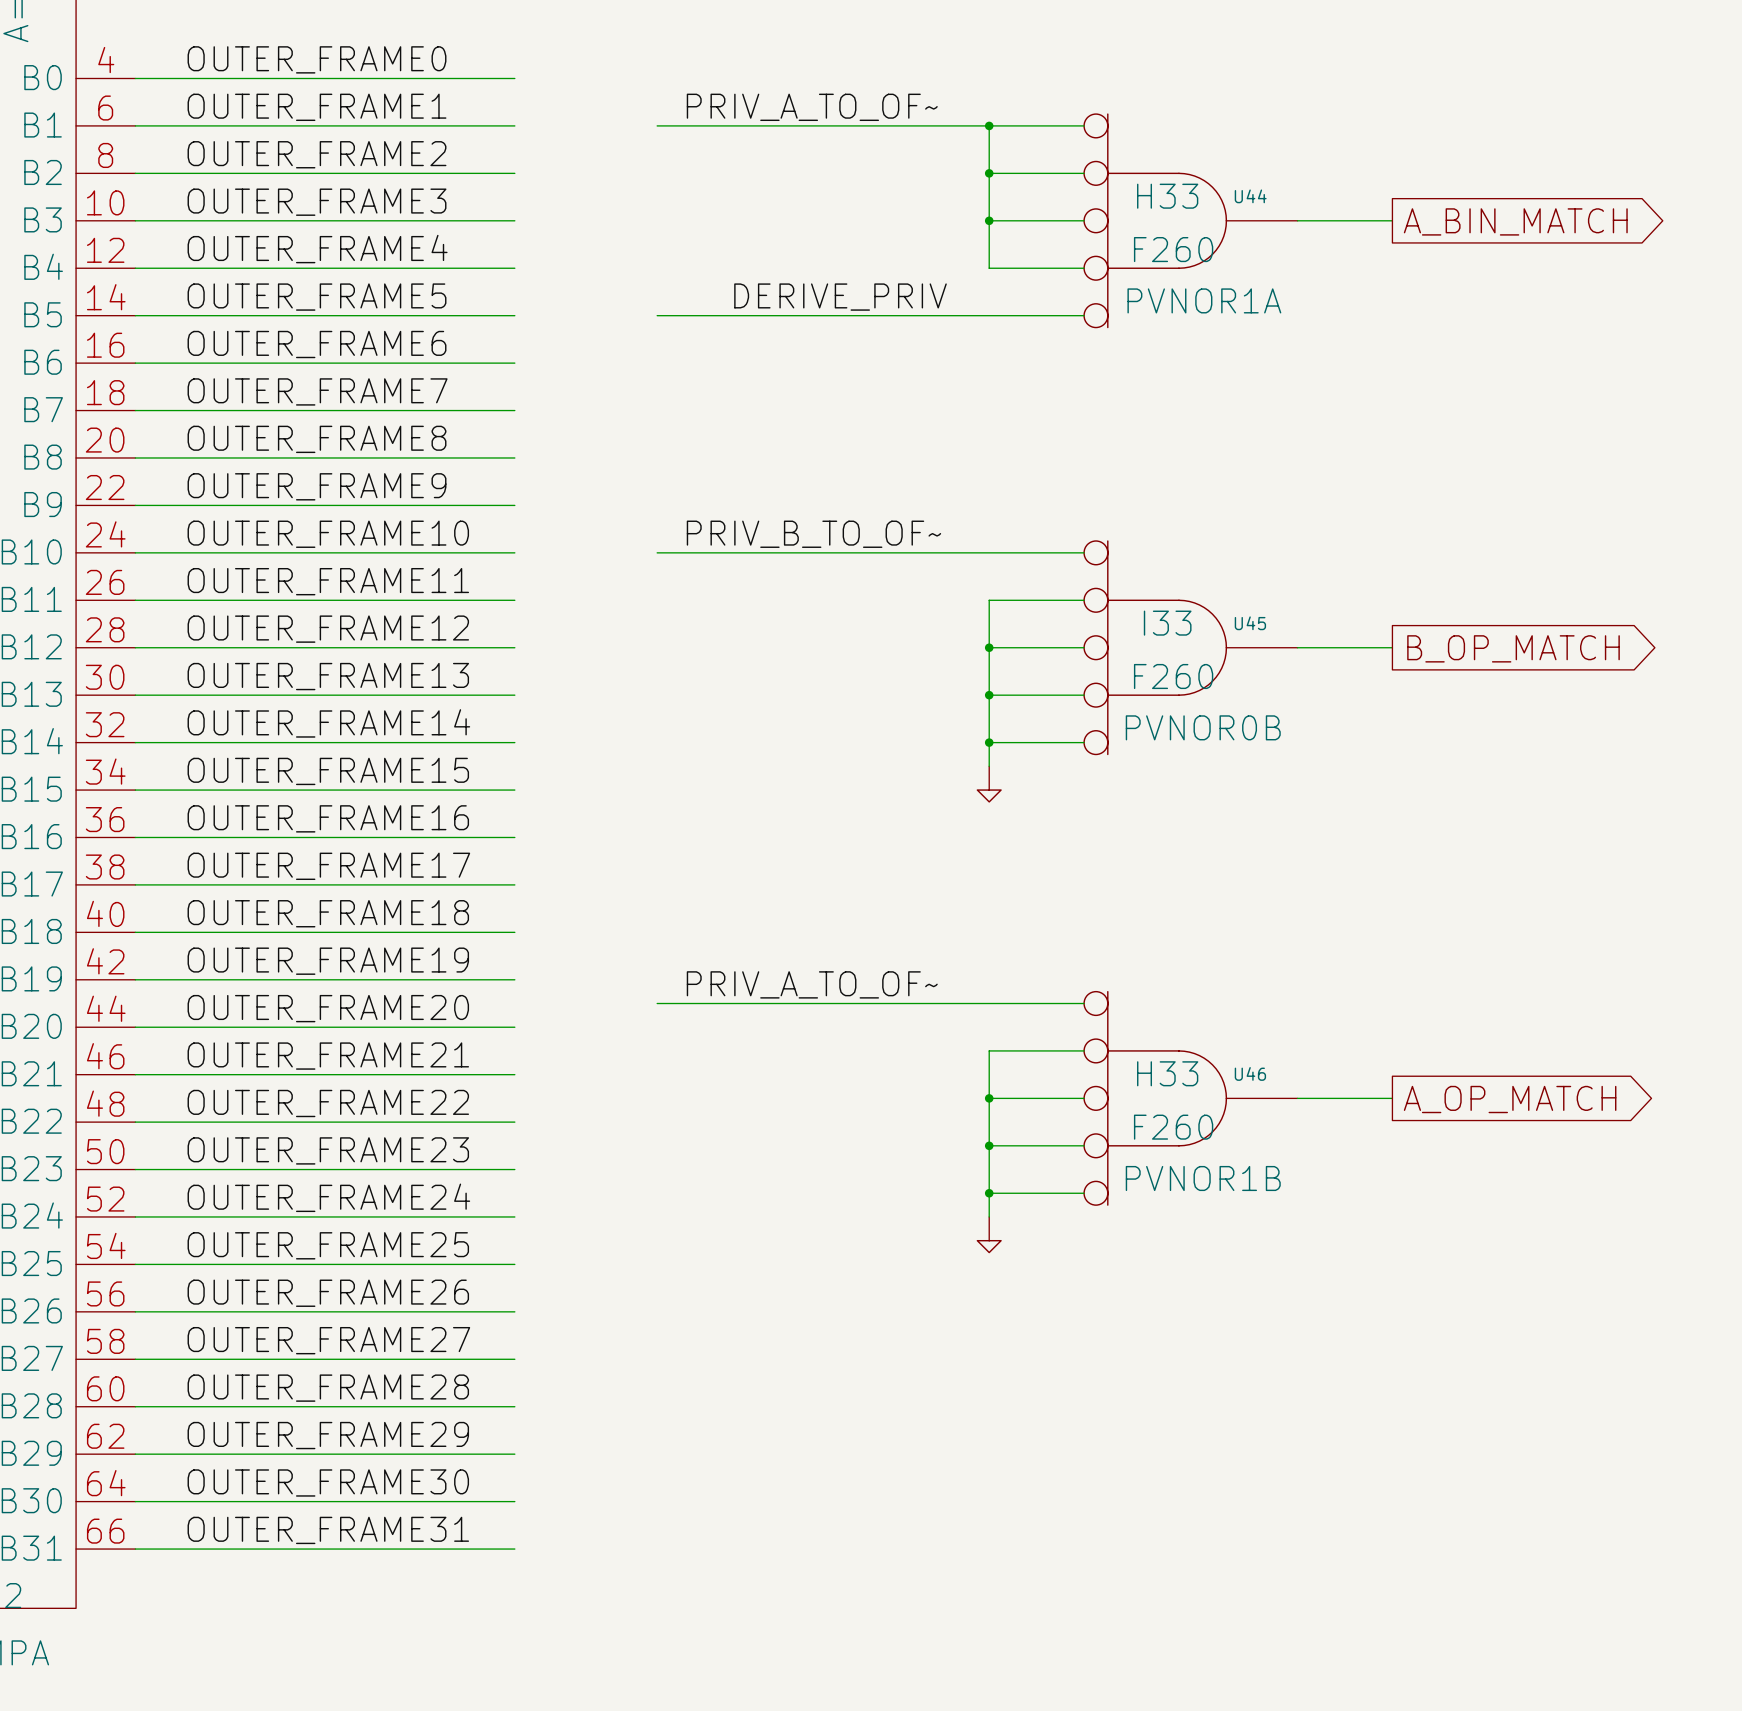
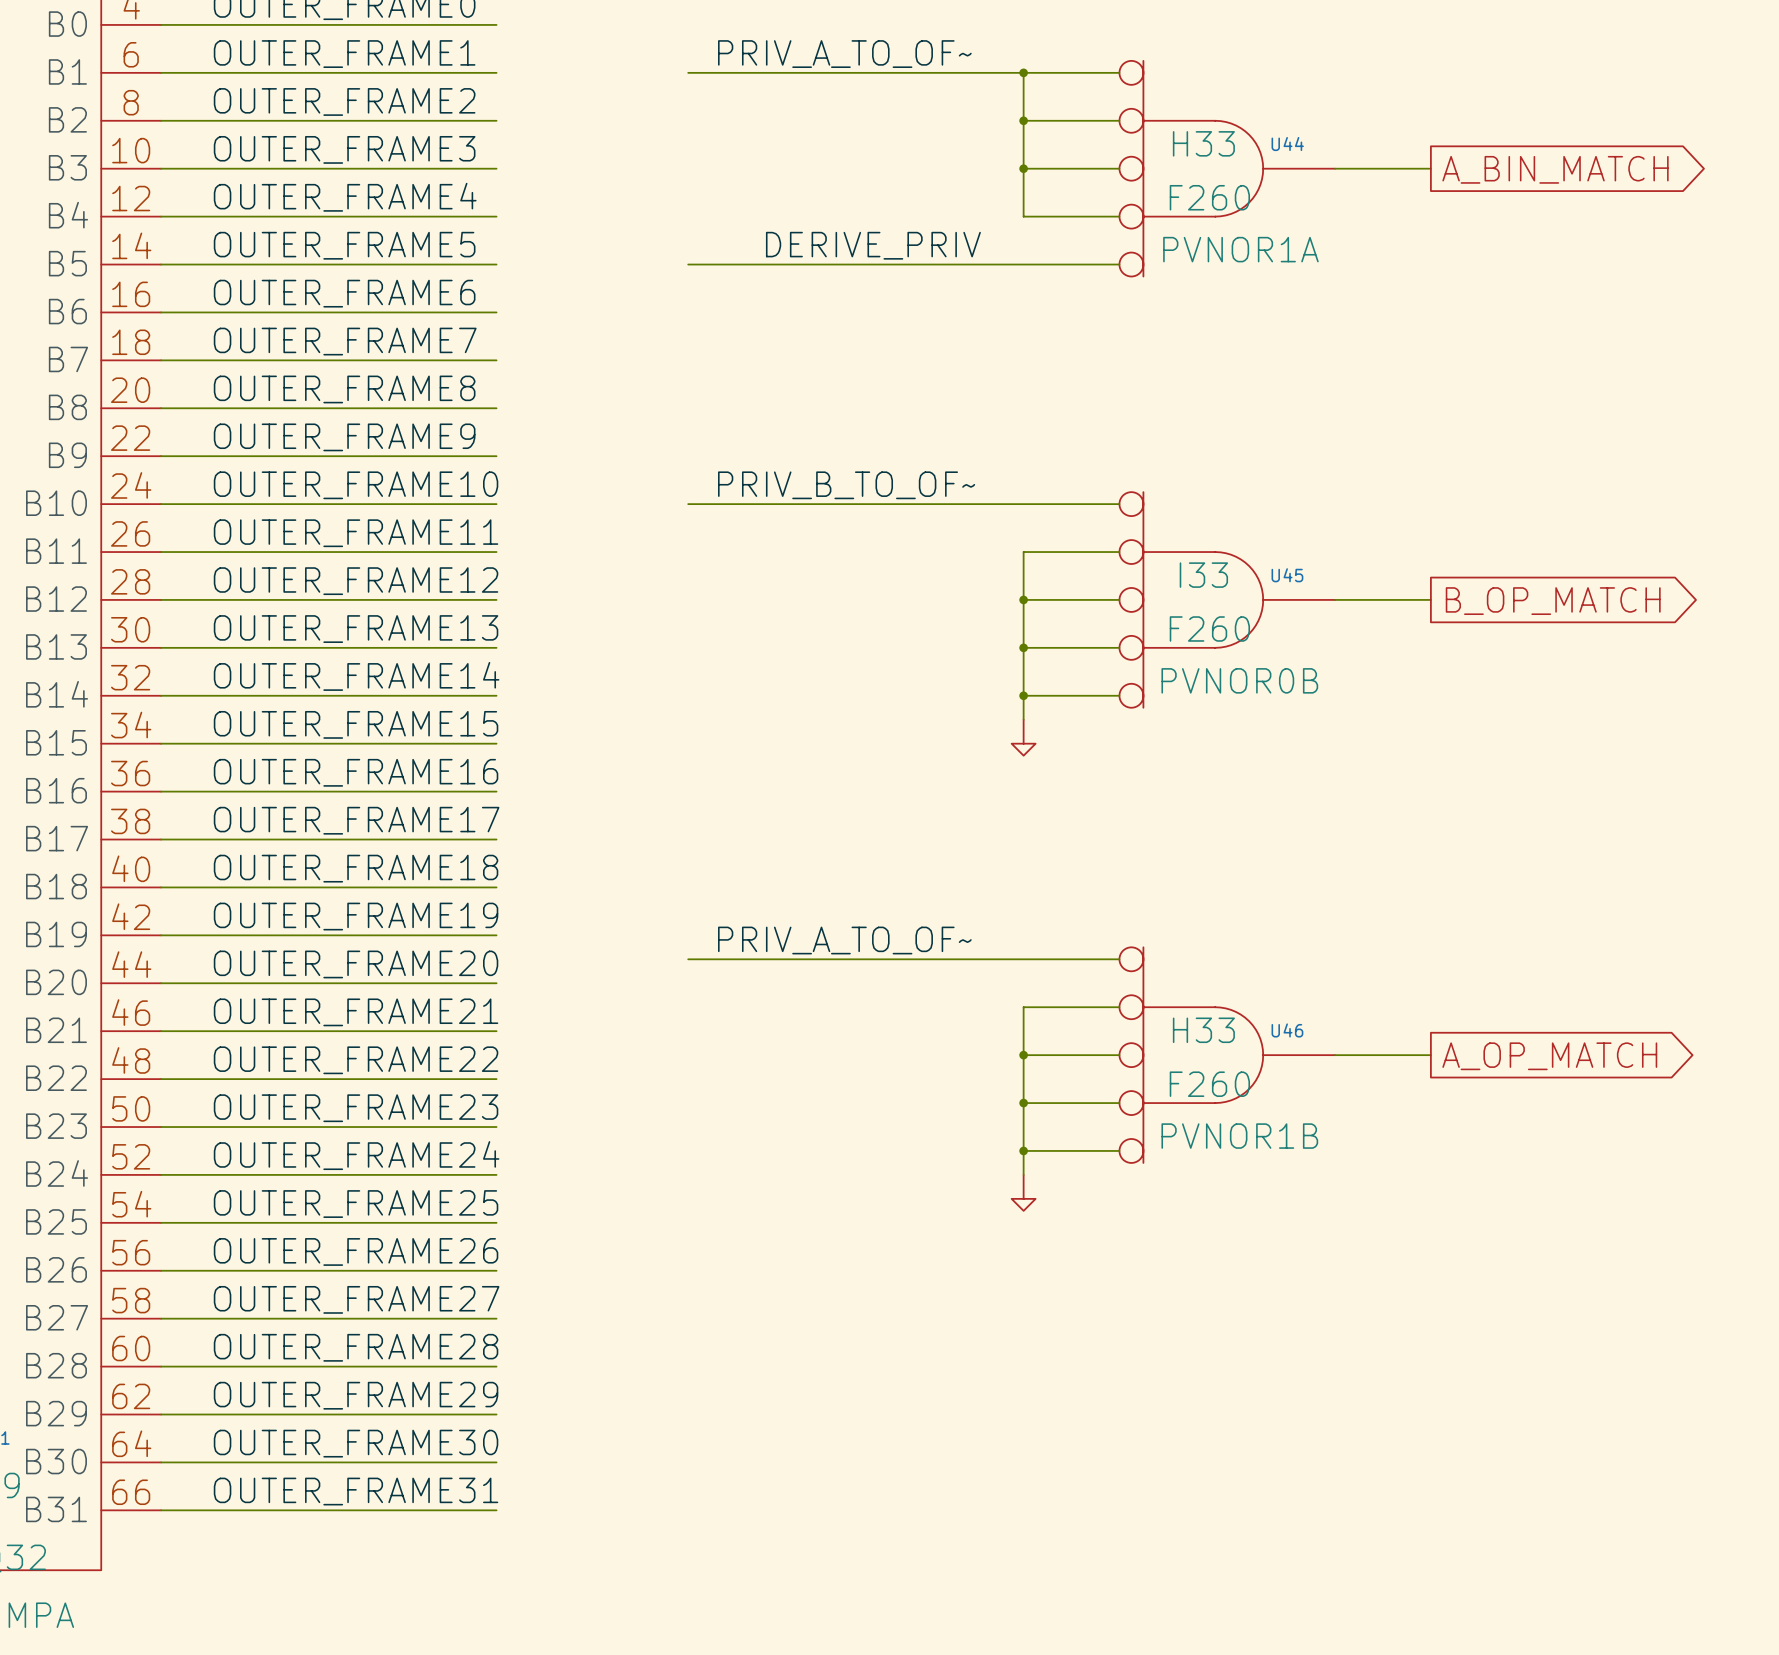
wire: (467, 78) (514, 78) -> none
wire: (467, 125) (514, 125) -> none
wire: (467, 173) (514, 173) -> none
wire: (467, 220) (514, 220) -> none
wire: (467, 268) (514, 268) -> none
wire: (467, 315) (514, 315) -> none
wire: (467, 363) (514, 363) -> none
wire: (467, 410) (514, 410) -> none
wire: (467, 457) (514, 457) -> none
wire: (467, 505) (514, 505) -> none
wire: (467, 552) (514, 552) -> none
wire: (467, 600) (514, 600) -> none
wire: (467, 647) (514, 647) -> none
wire: (467, 695) (514, 695) -> none
wire: (467, 742) (514, 742) -> none
wire: (467, 790) (514, 790) -> none
wire: (467, 837) (514, 837) -> none
wire: (467, 884) (514, 884) -> none
wire: (467, 932) (514, 932) -> none
wire: (467, 979) (514, 979) -> none
wire: (467, 1027) (514, 1027) -> none
wire: (467, 1074) (514, 1074) -> none
wire: (467, 1122) (514, 1122) -> none
wire: (467, 1169) (514, 1169) -> none
wire: (467, 1216) (514, 1216) -> none
wire: (467, 1264) (514, 1264) -> none
wire: (467, 1311) (514, 1311) -> none
wire: (467, 1359) (514, 1359) -> none
wire: (467, 1406) (514, 1406) -> none
wire: (467, 1454) (514, 1454) -> none
wire: (467, 1501) (514, 1501) -> none
wire: (467, 1549) (514, 1549) -> none

